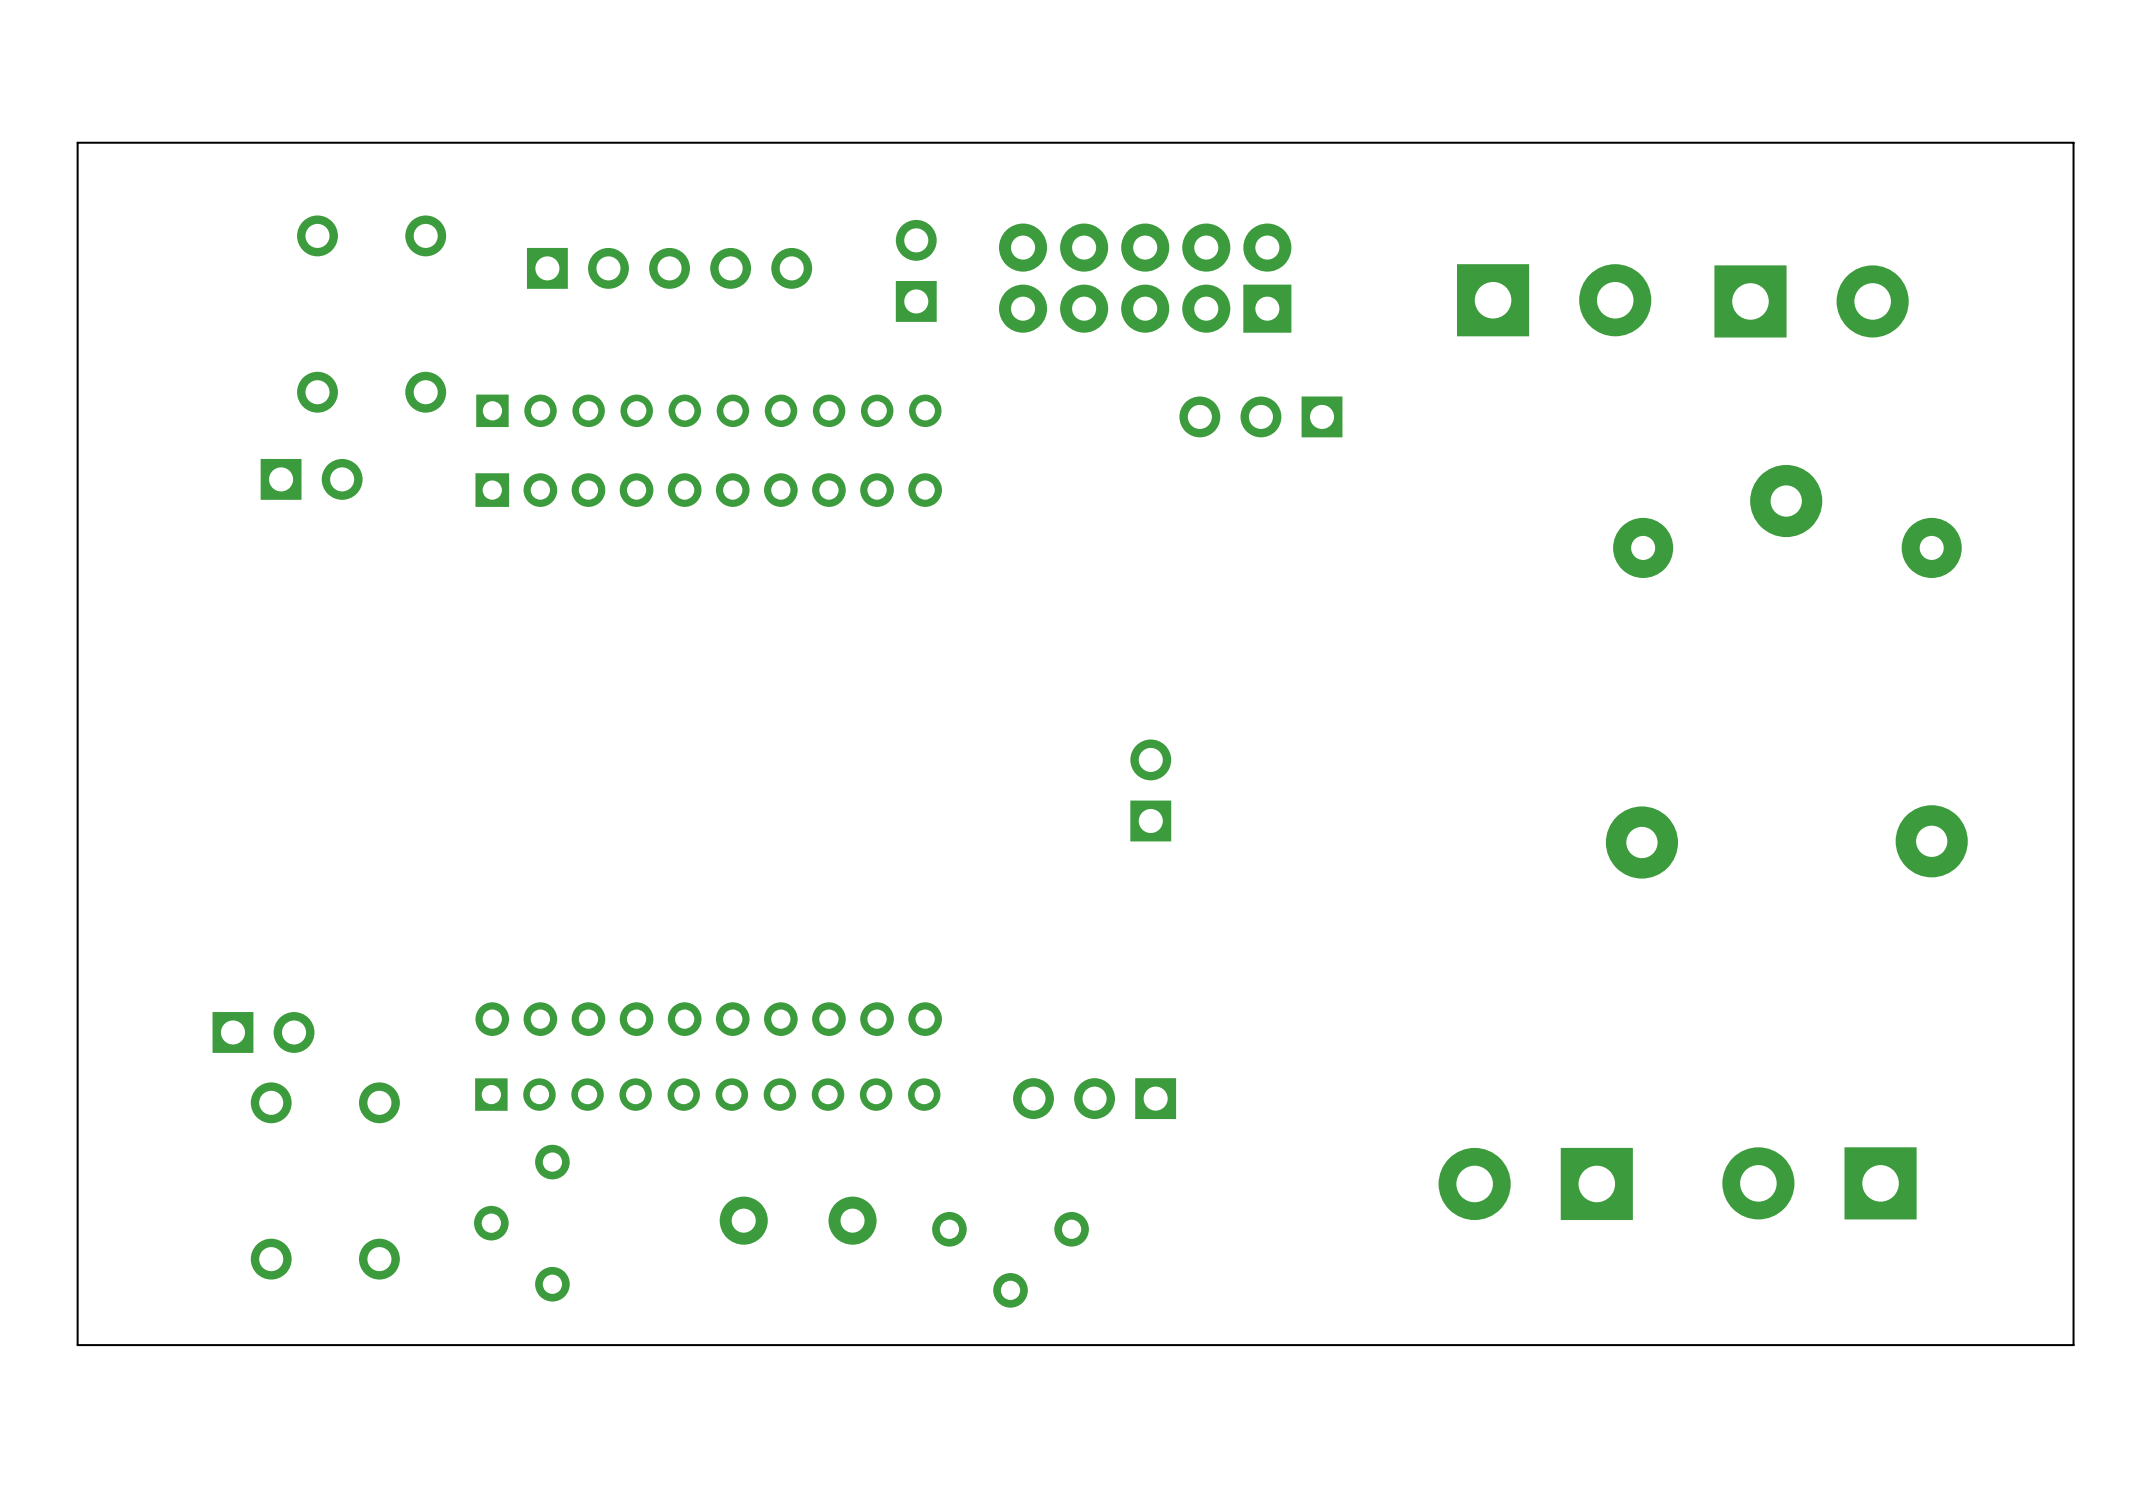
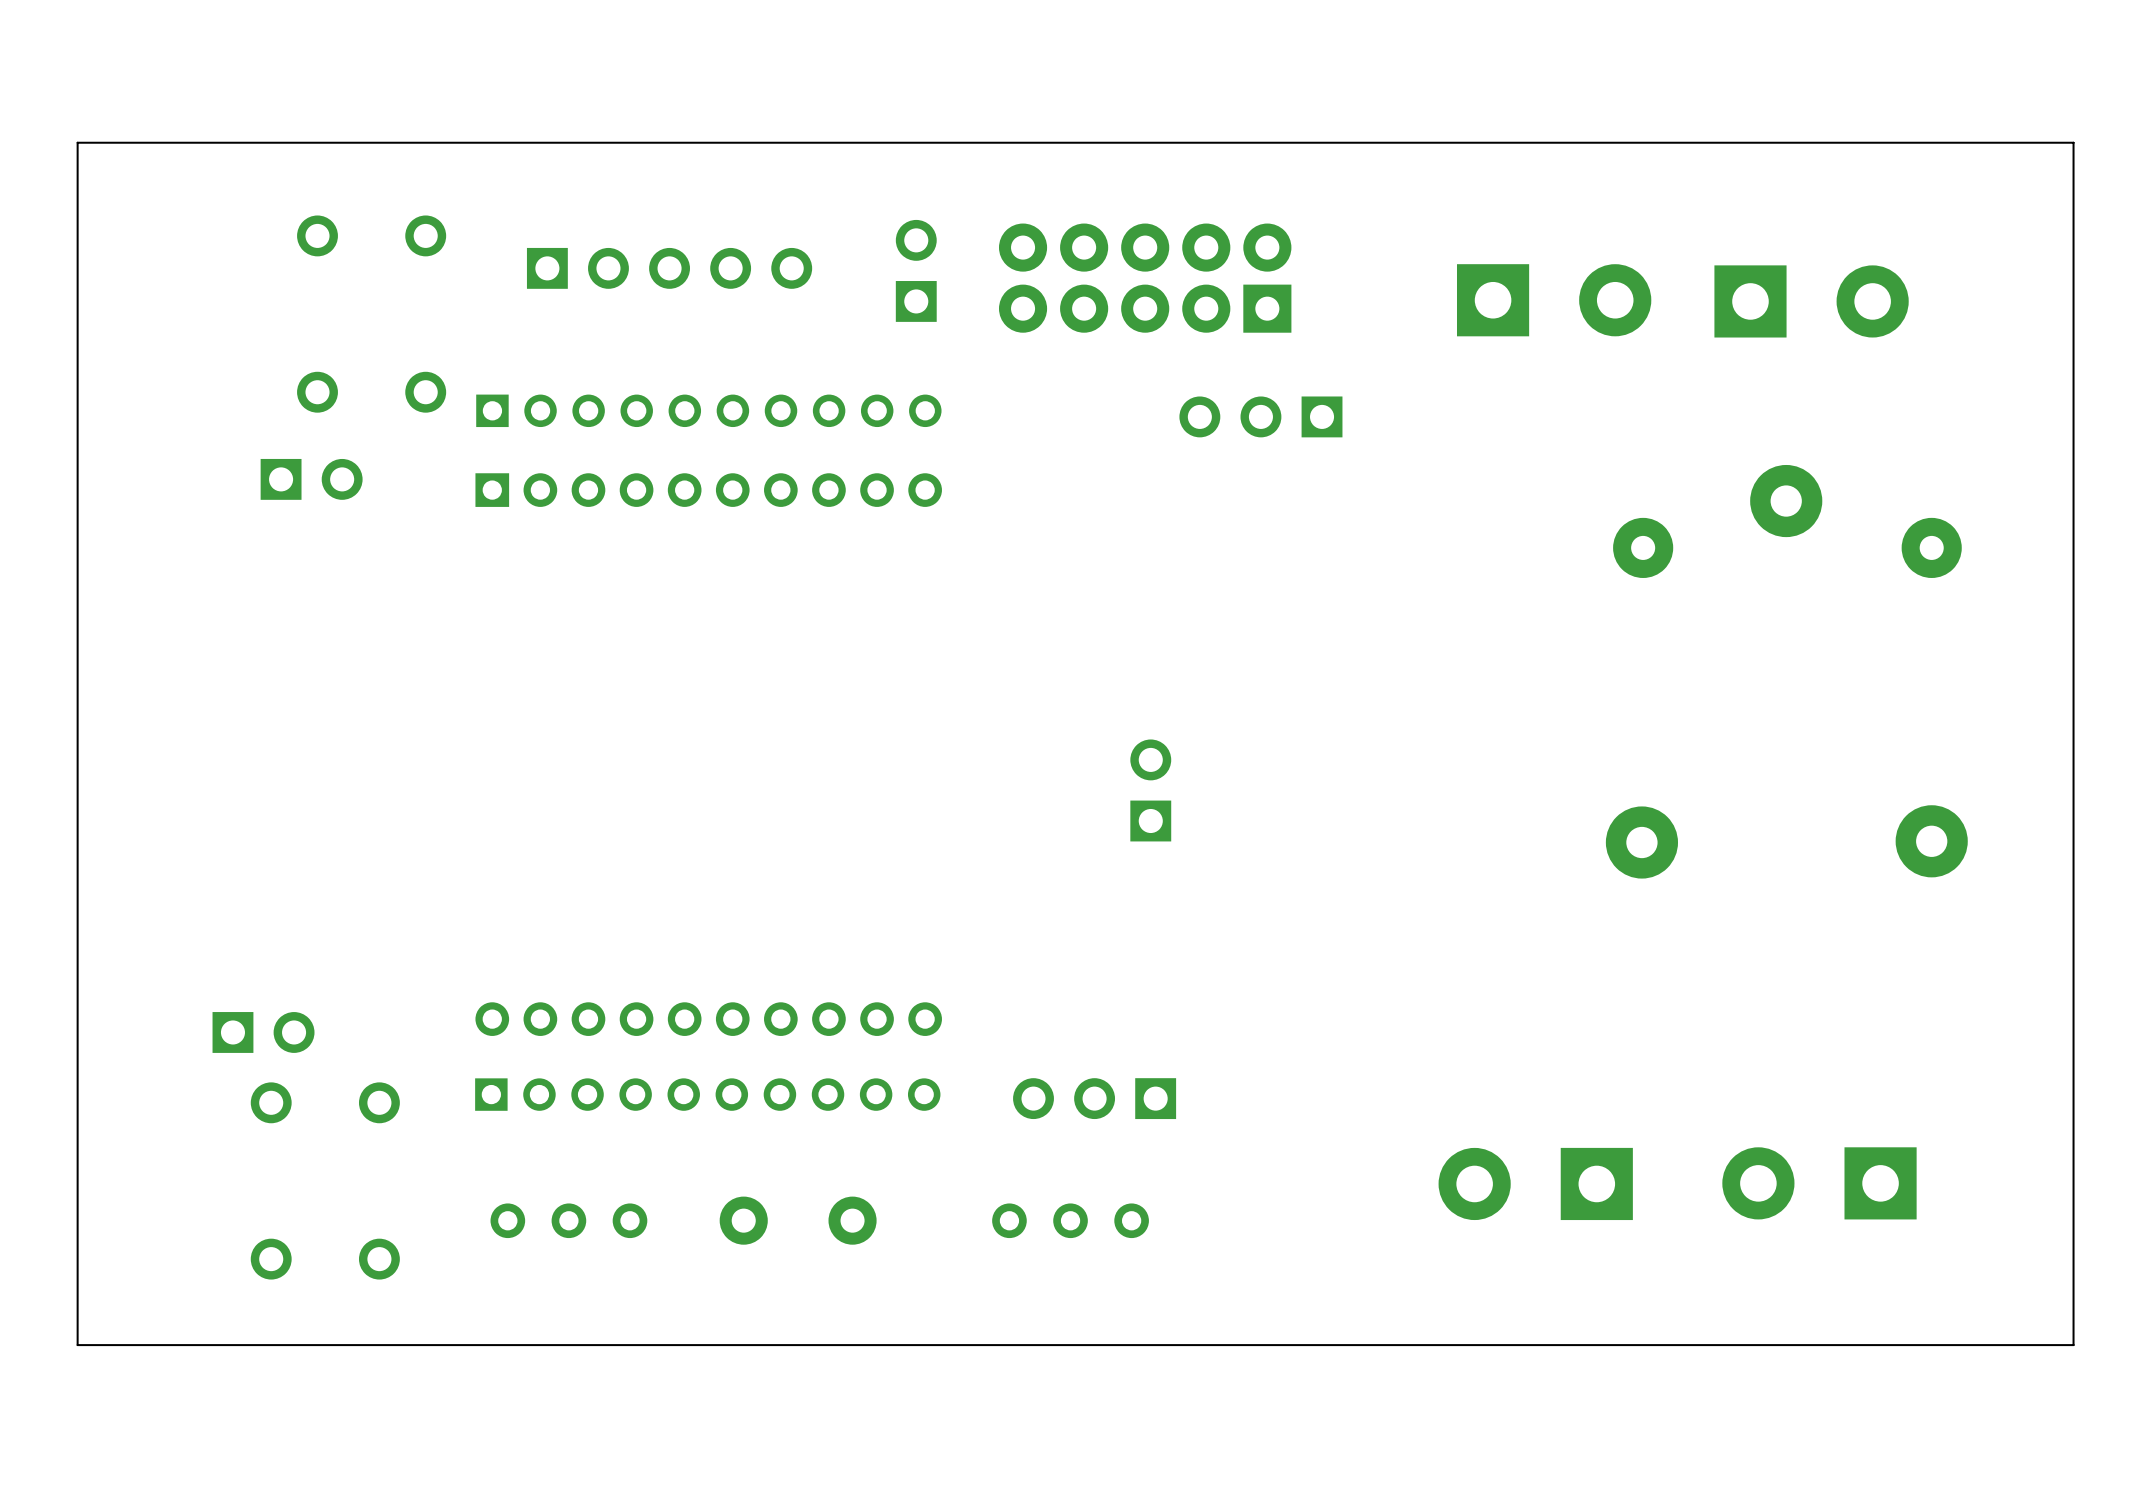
part: none -> (568, 1220)
part: none -> (1070, 1220)
part: (521, 1223) -> none
part: (1010, 1259) -> none

